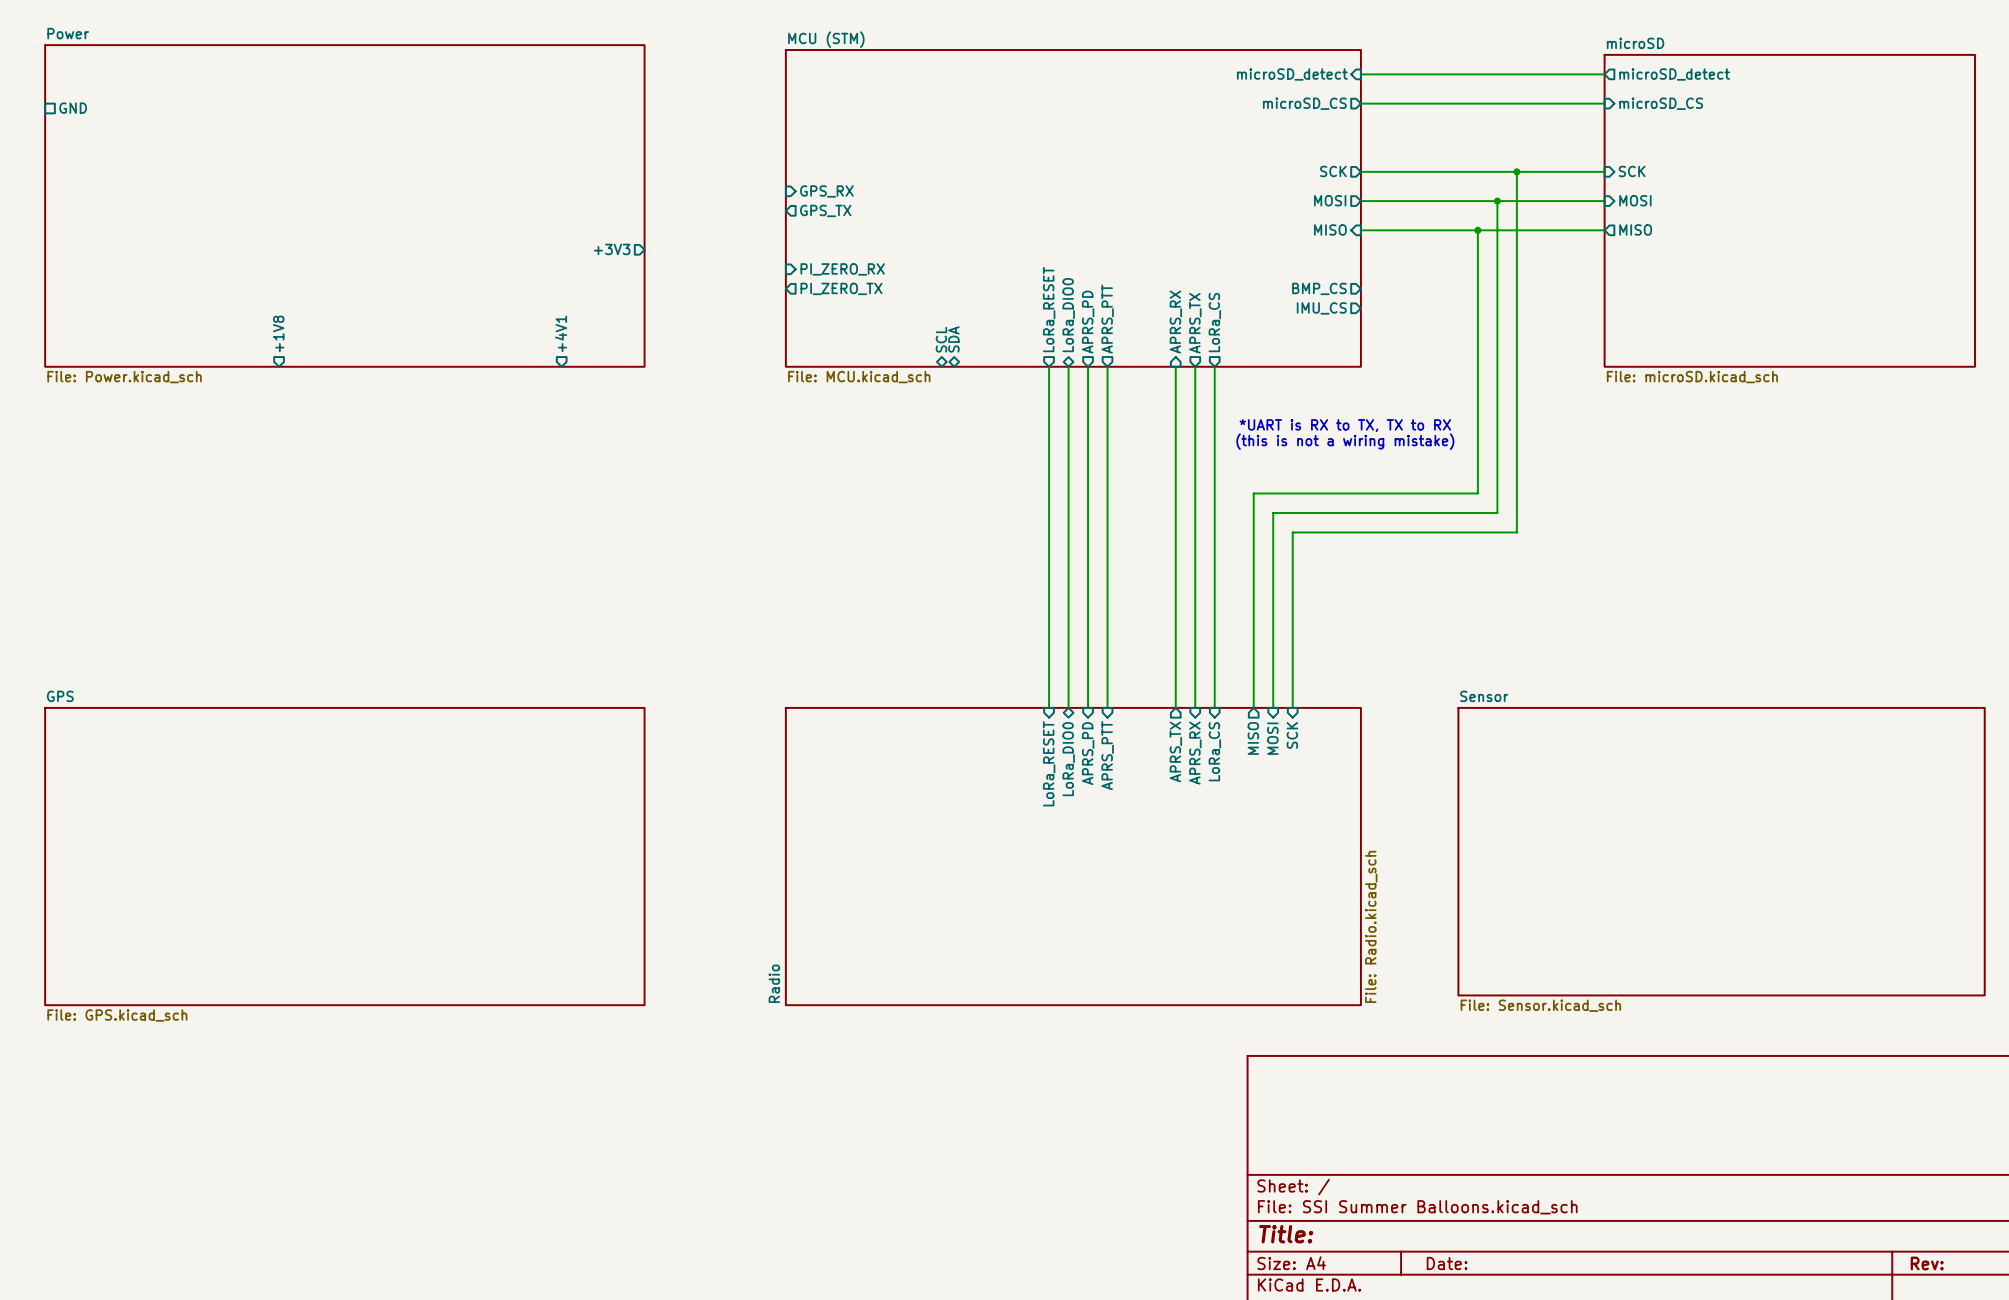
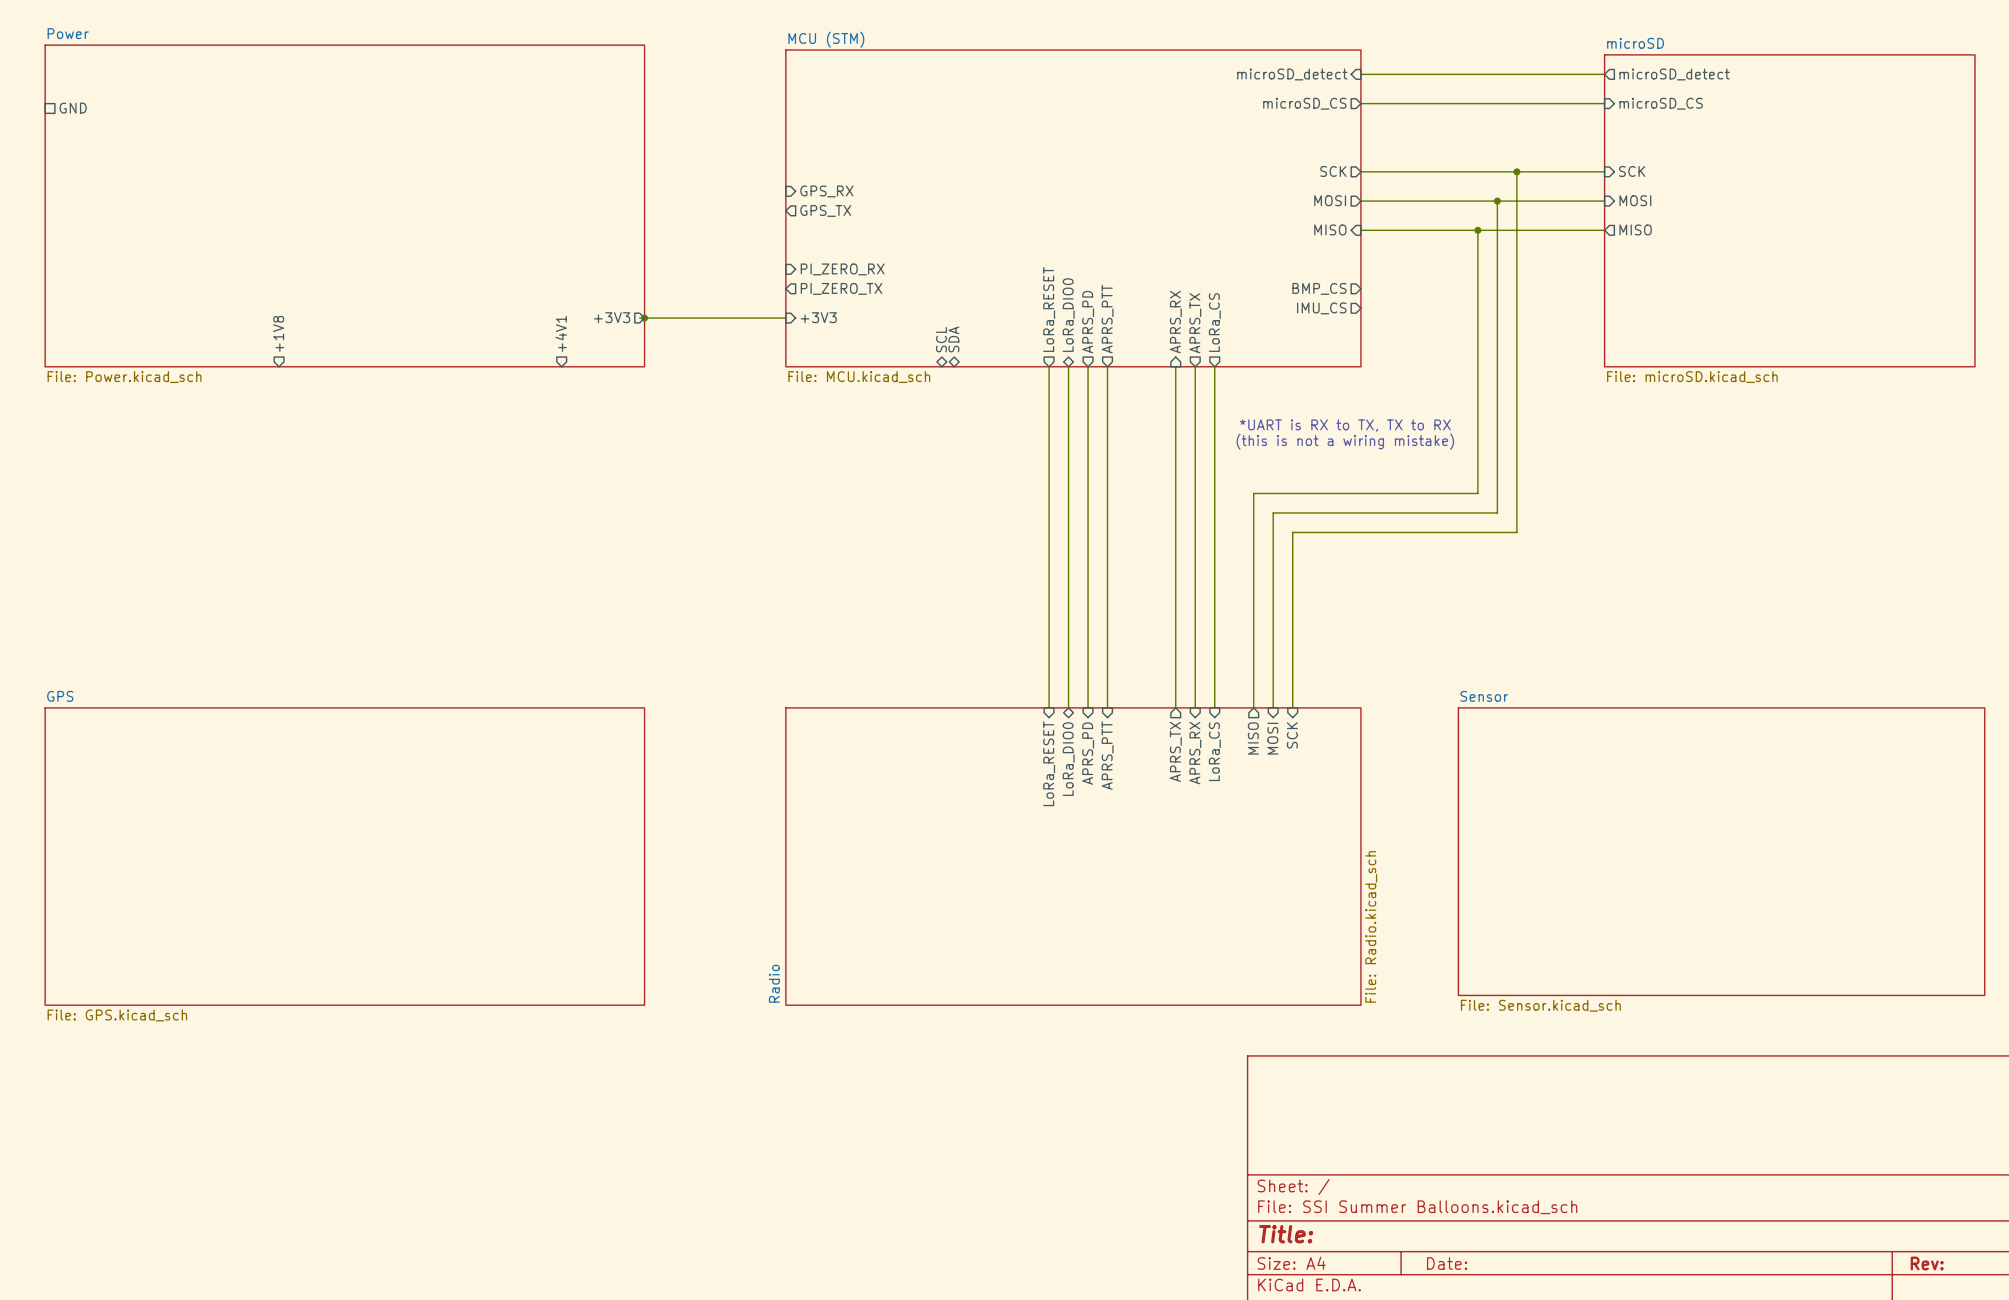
sheet pin position: +3V3 (612, 249) -> +3V3 (612, 317)
sheet pin: none -> +3V3 (818, 317)
wire: none -> (639, 318) (785, 318)
junction: none -> (644, 318)

